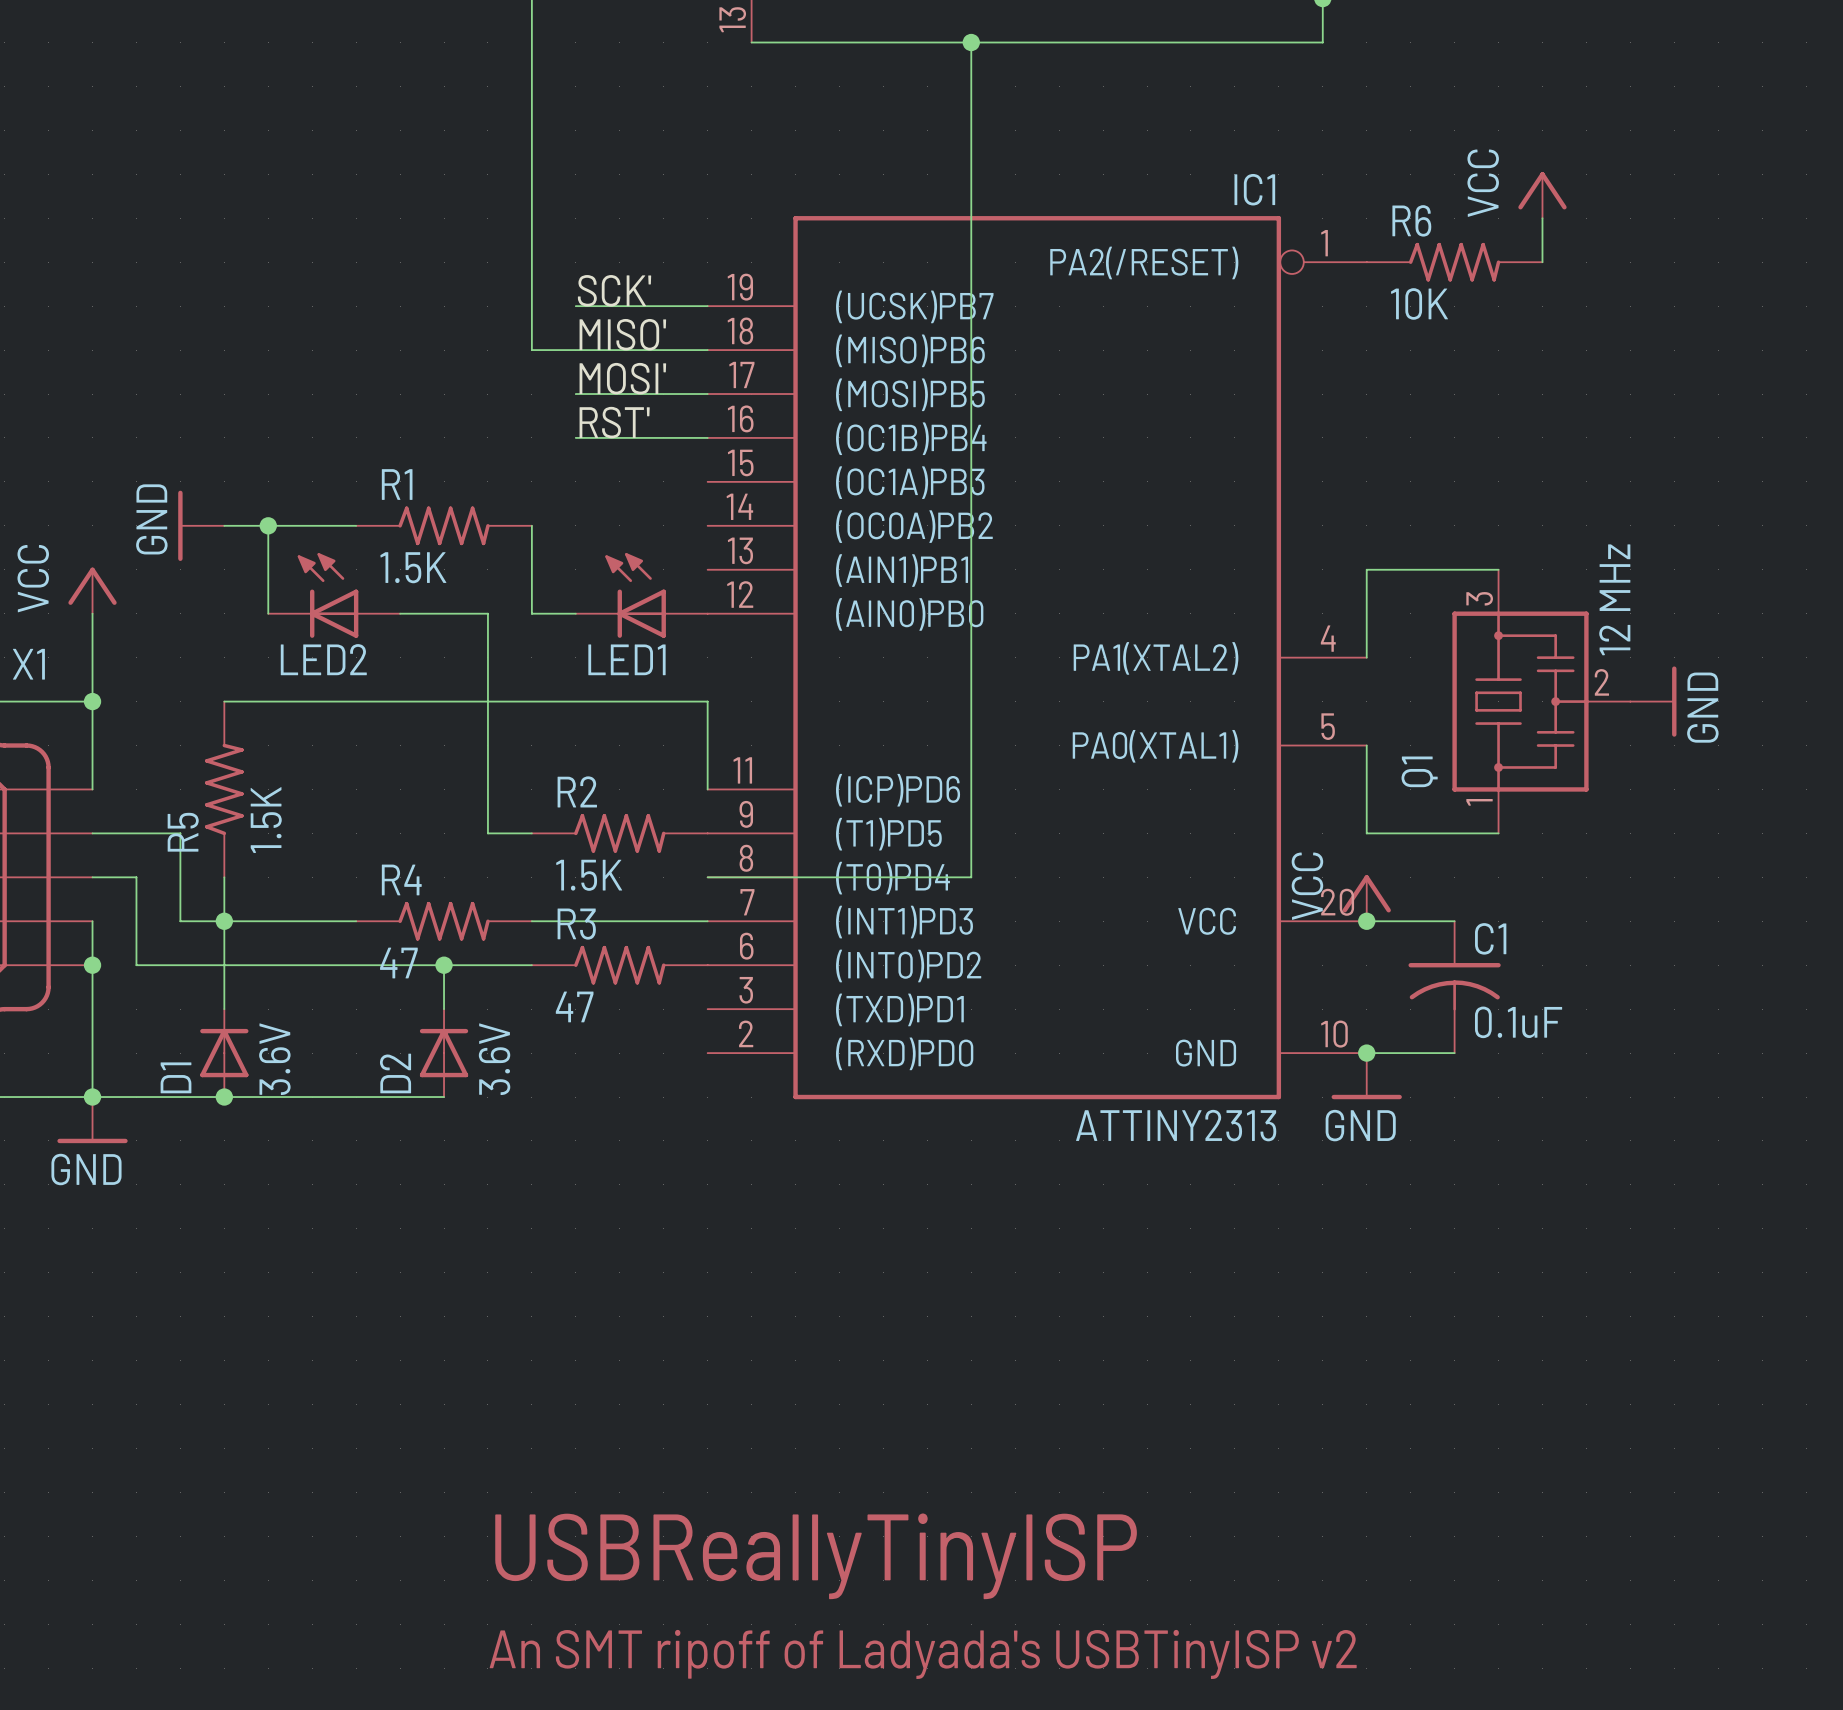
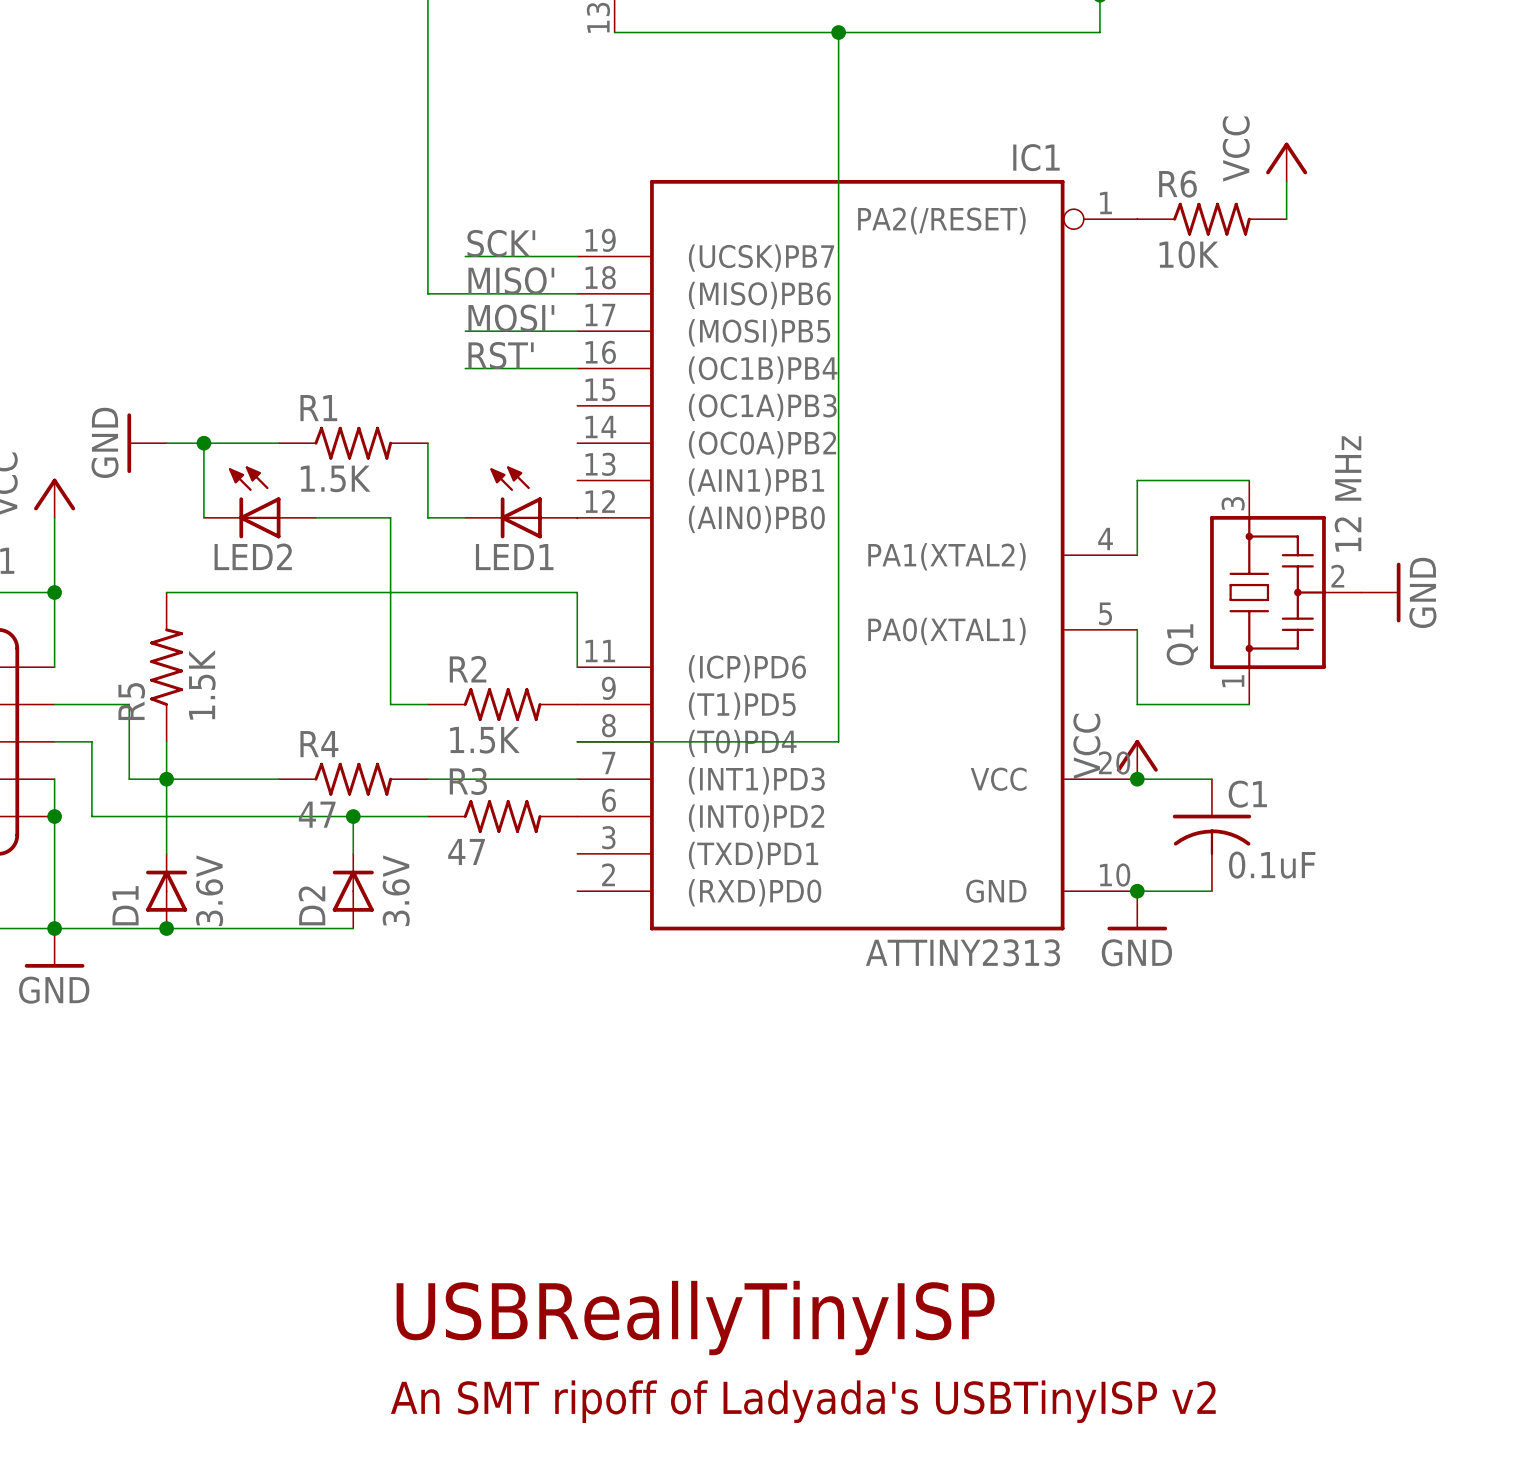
wire: (971, 42) (971, 877) -> (838, 32) (838, 741) (801, 741)
junction position: (971, 42) -> (838, 32)

